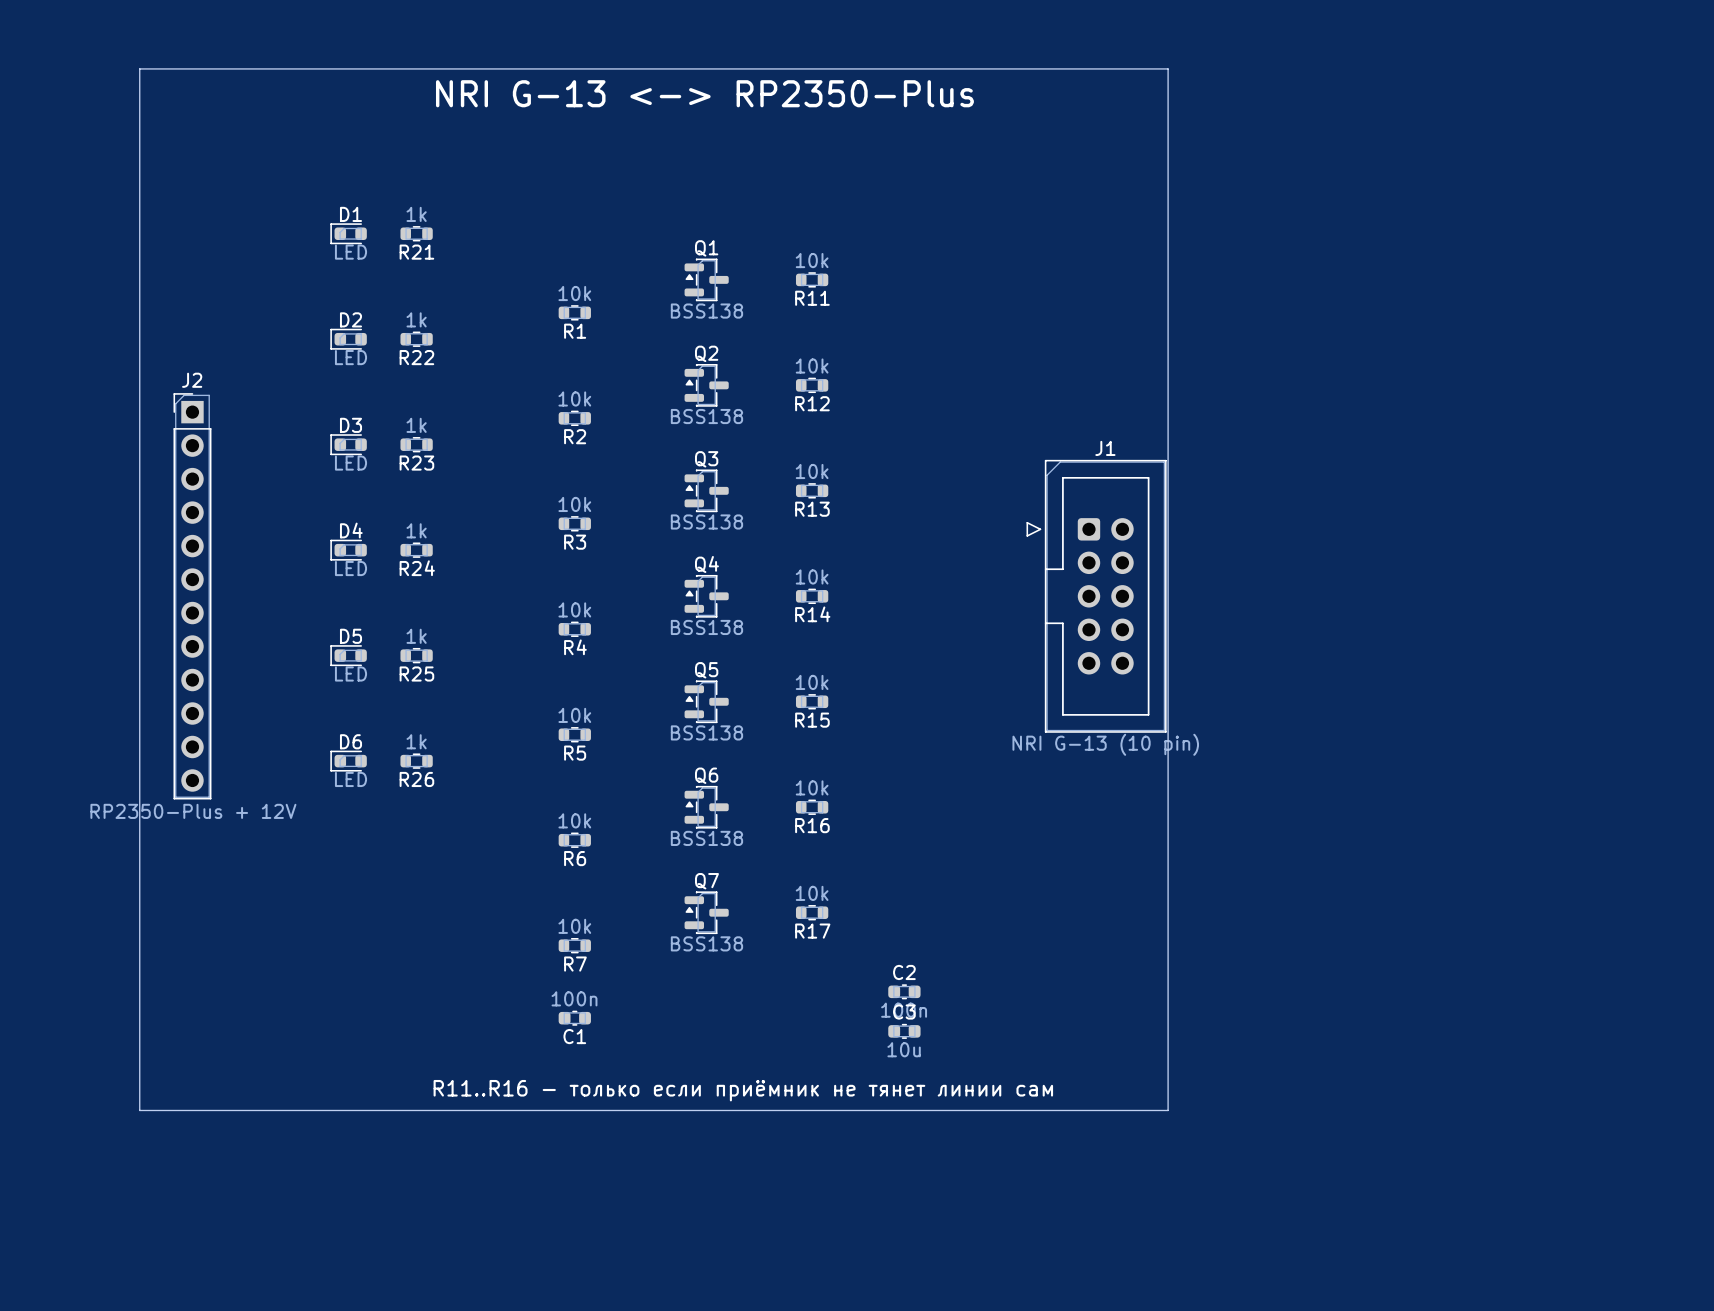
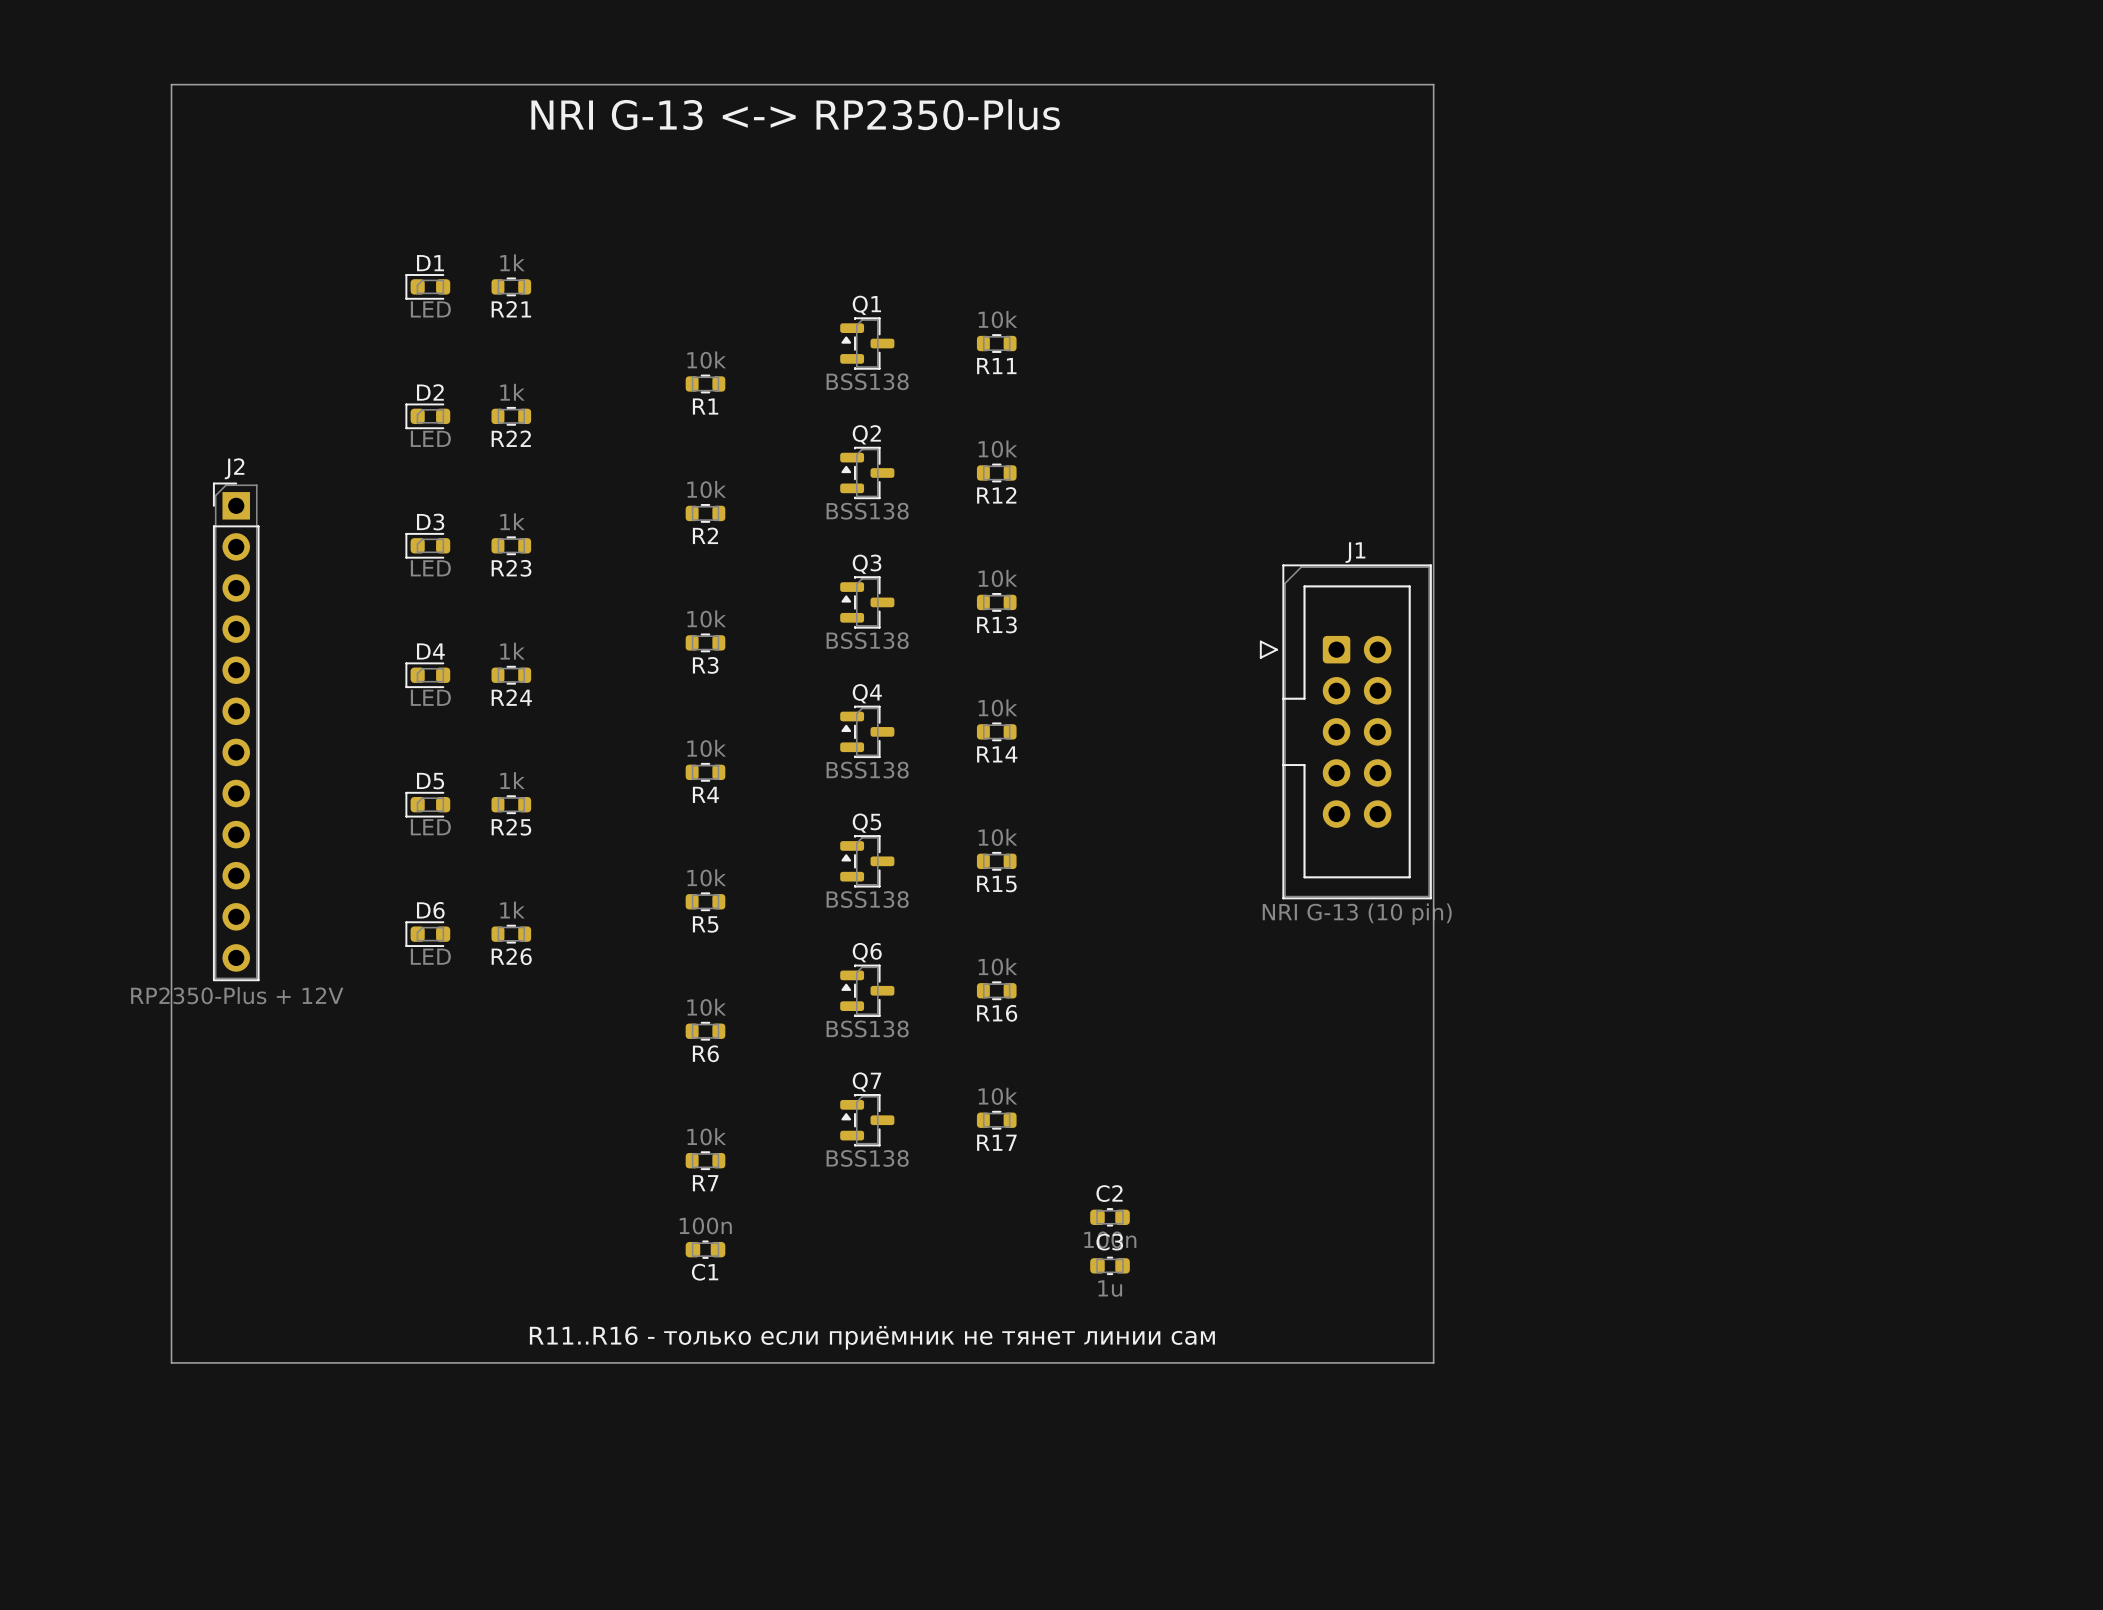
C3 value: 10u (904, 1049) -> 1u (1110, 1288)

